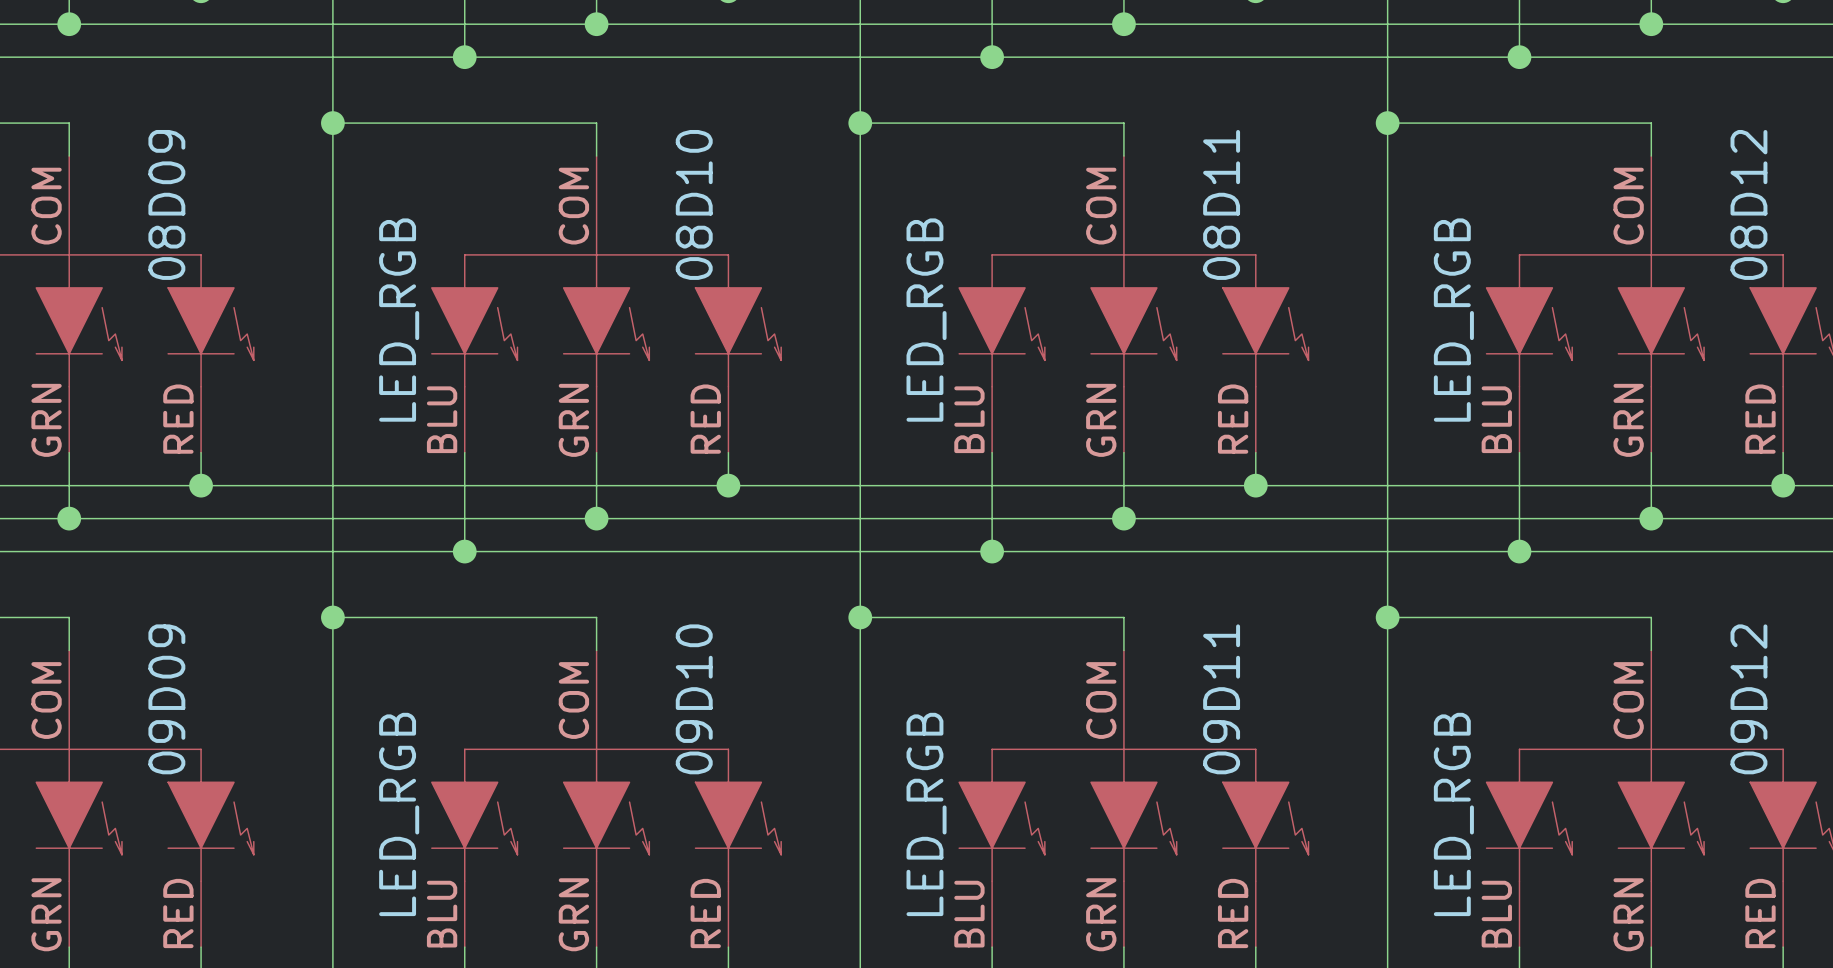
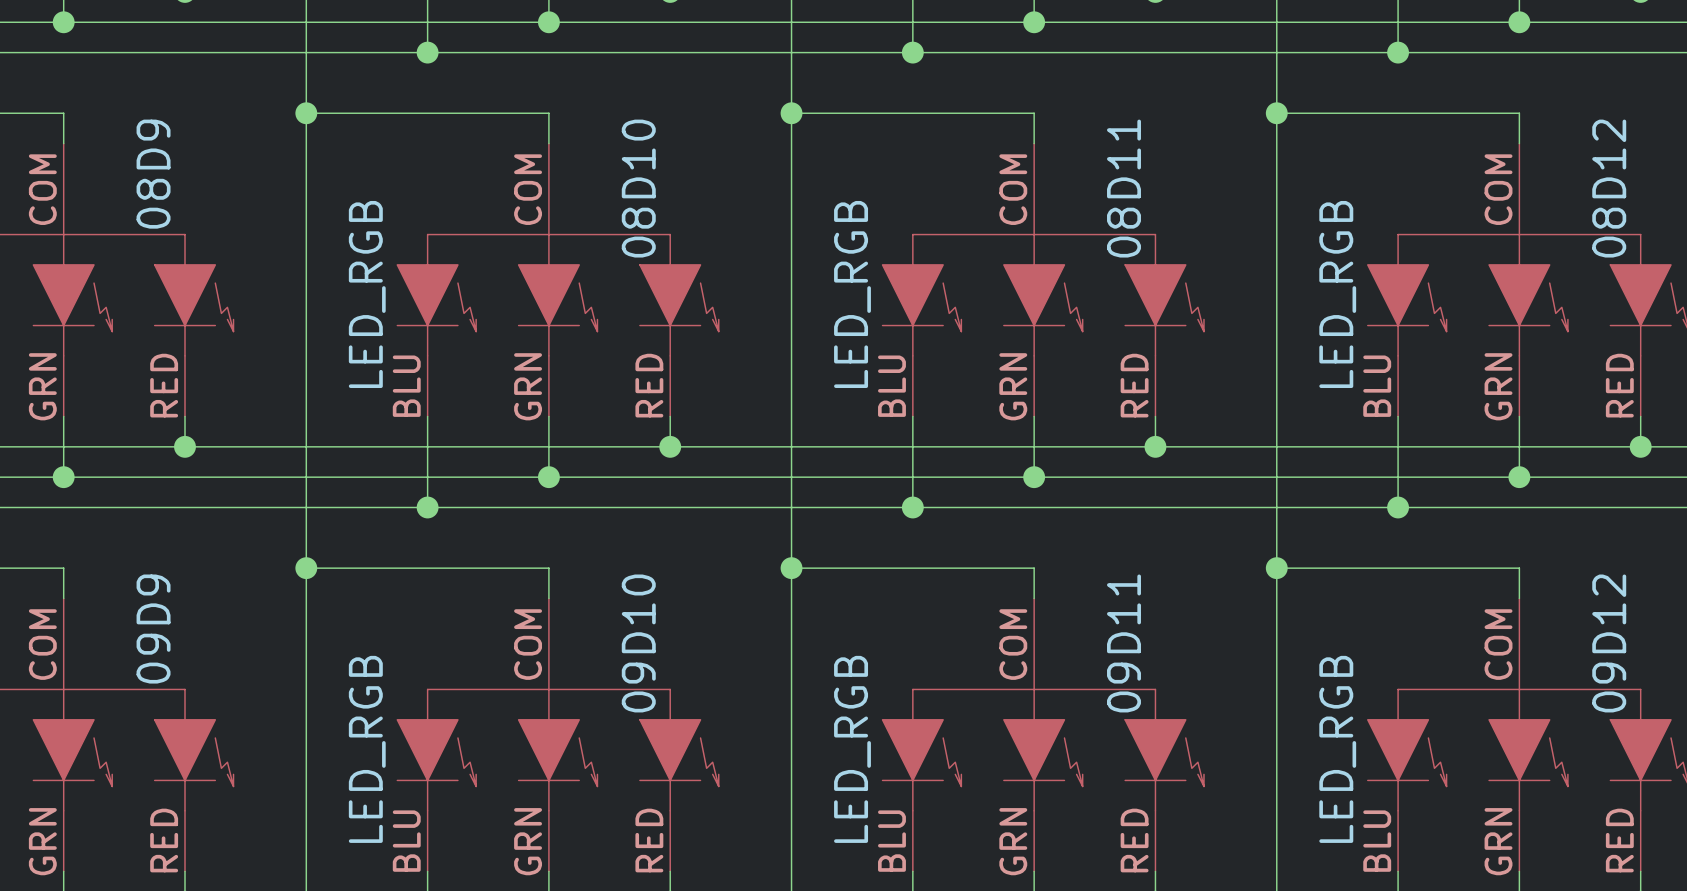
08D09 name: 08D09 (166, 204) -> 08D9 (153, 174)
09D09 name: 09D09 (166, 699) -> 09D9 (153, 629)

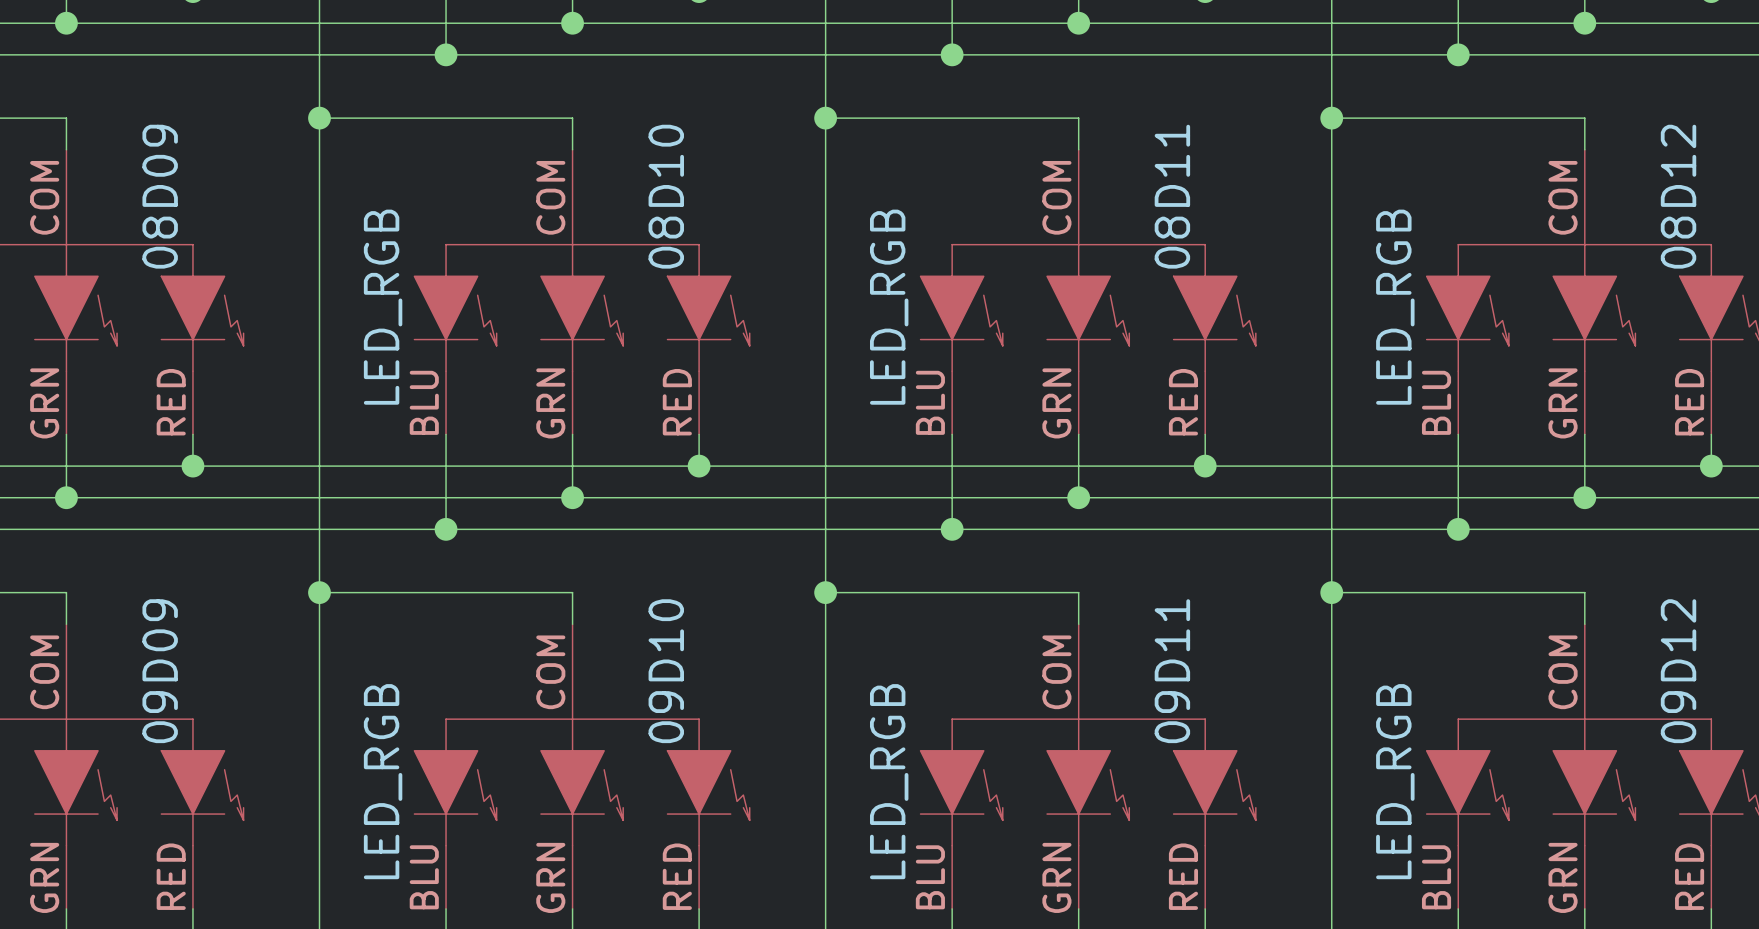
08D9 name: 08D9 (153, 174) -> 08D09 (160, 196)
09D9 name: 09D9 (153, 629) -> 09D09 (160, 671)

